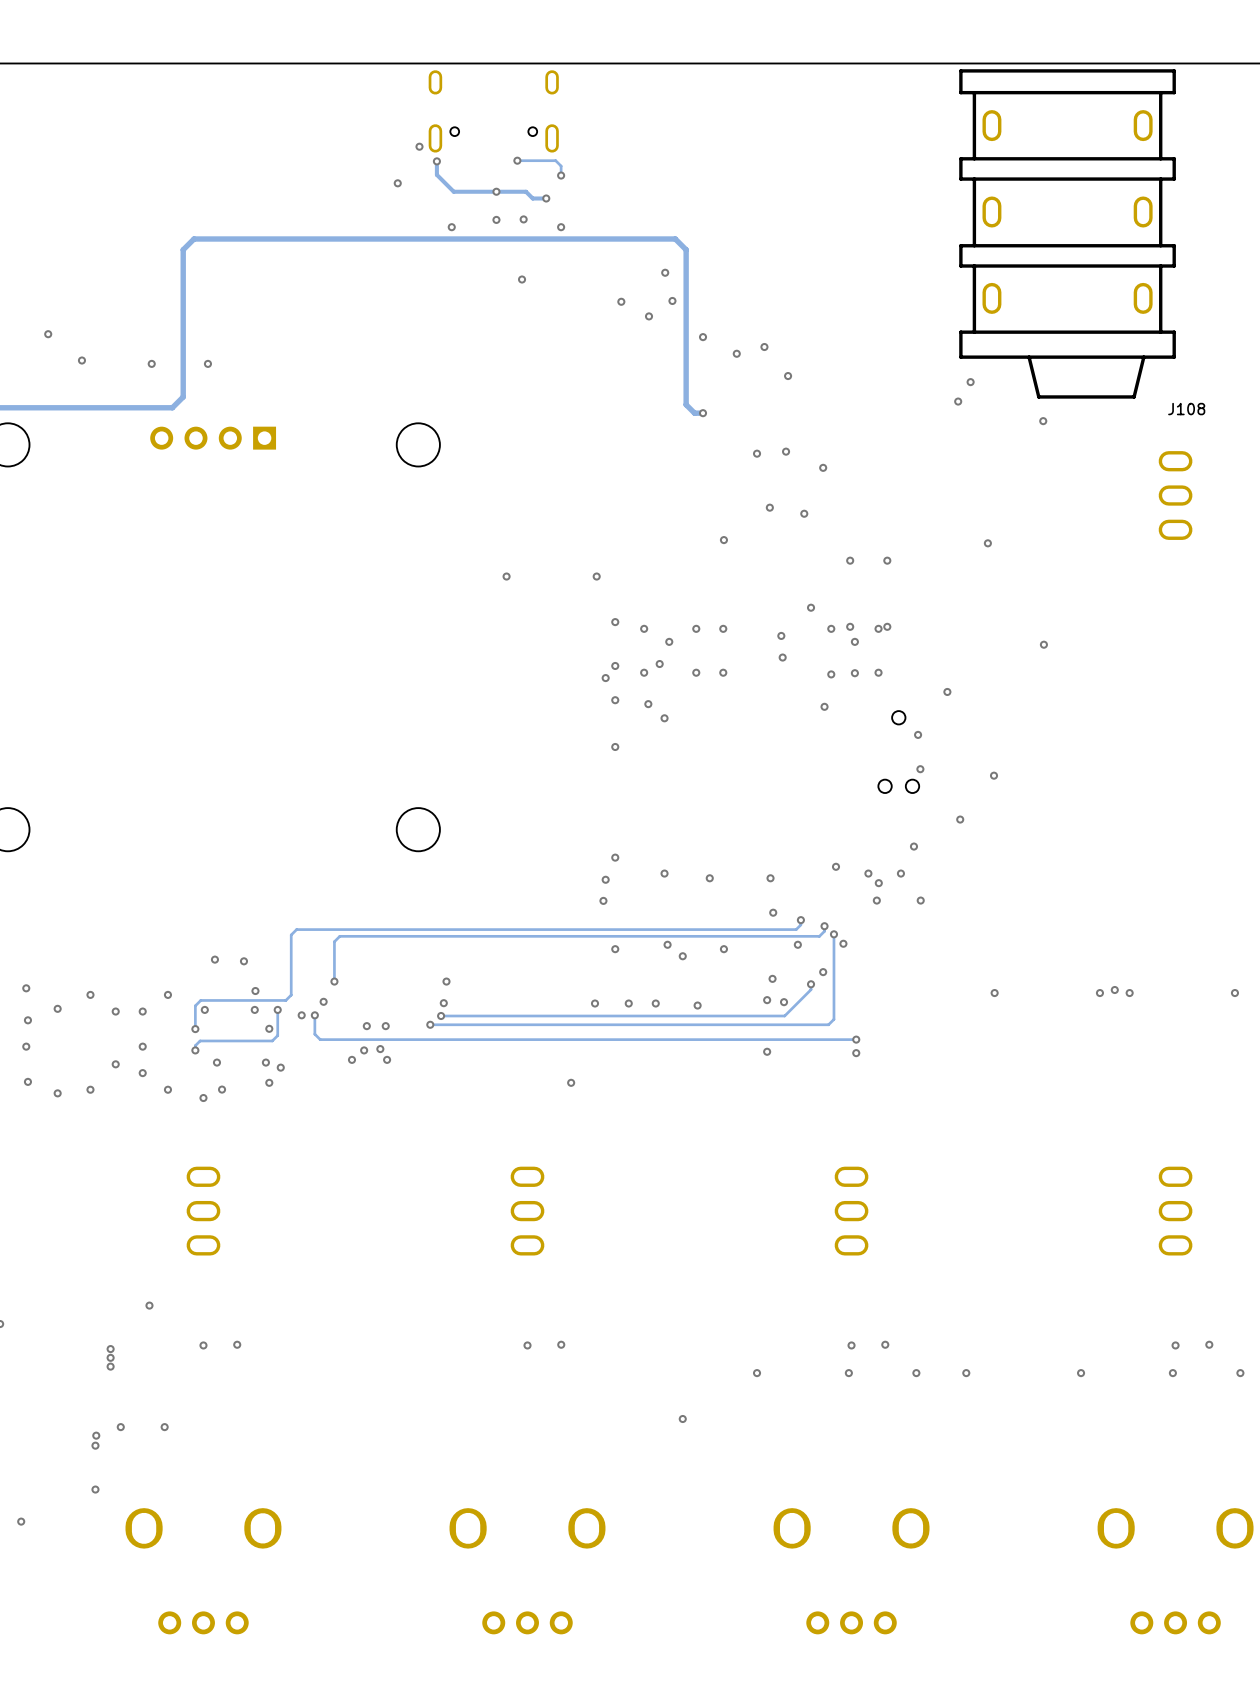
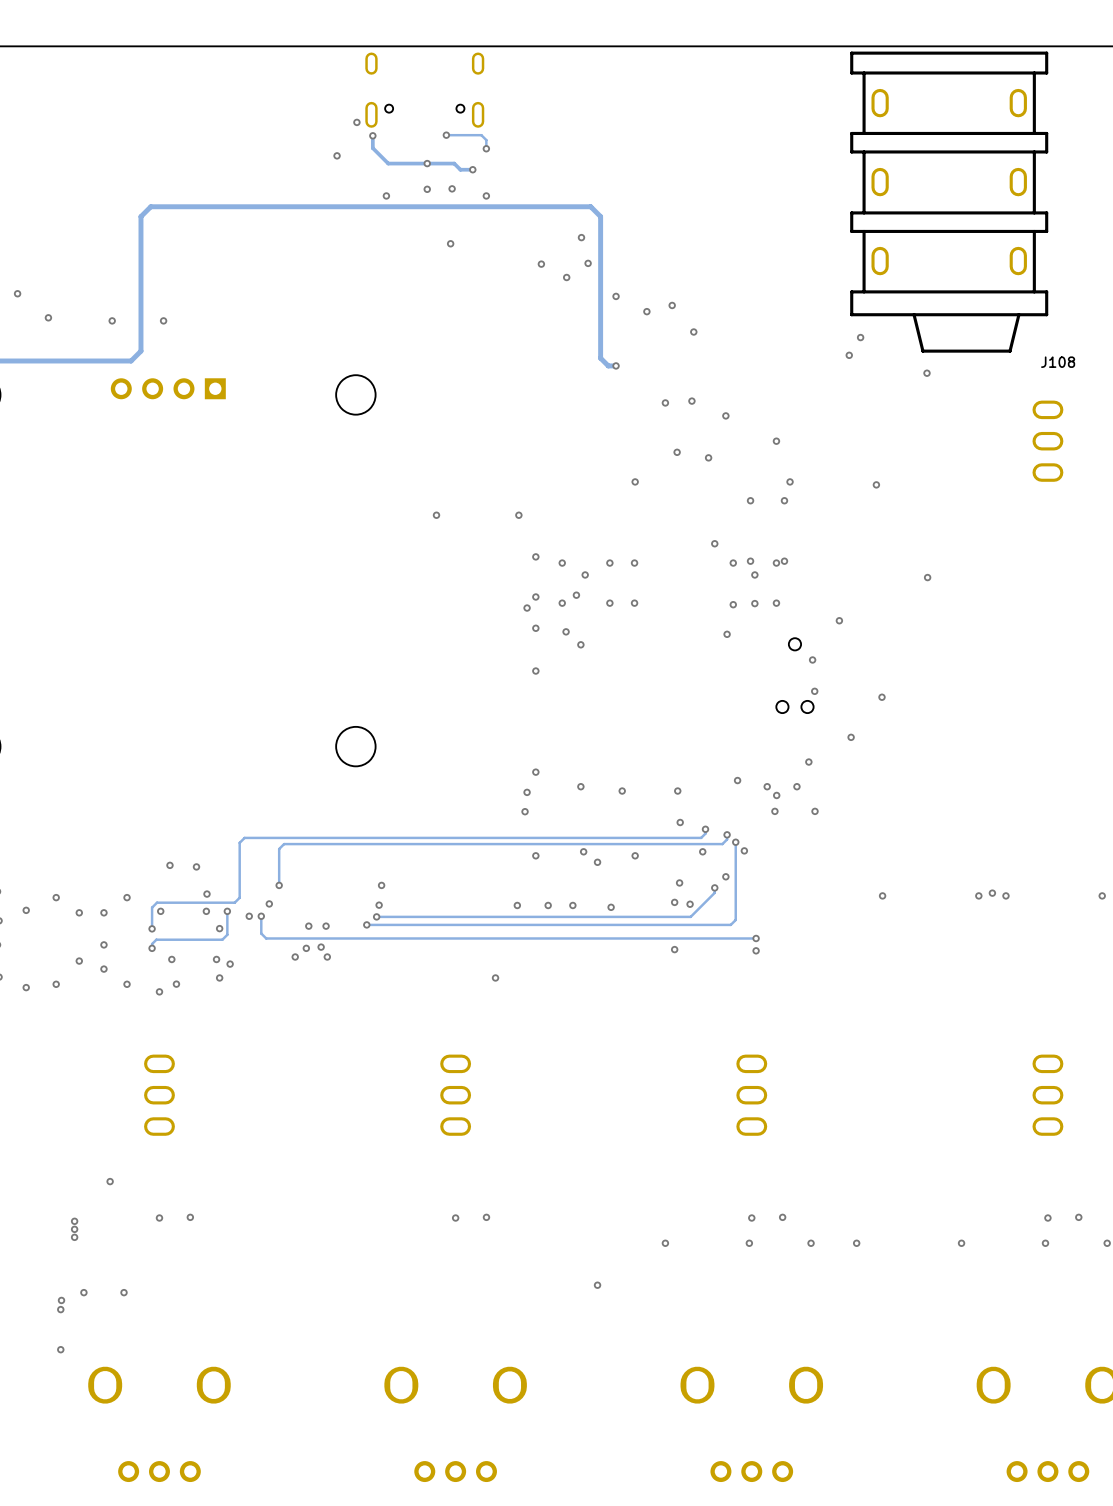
via: none -> (776, 441)
via: none -> (790, 481)
via: (781, 635) -> none
via: (782, 657) -> none

